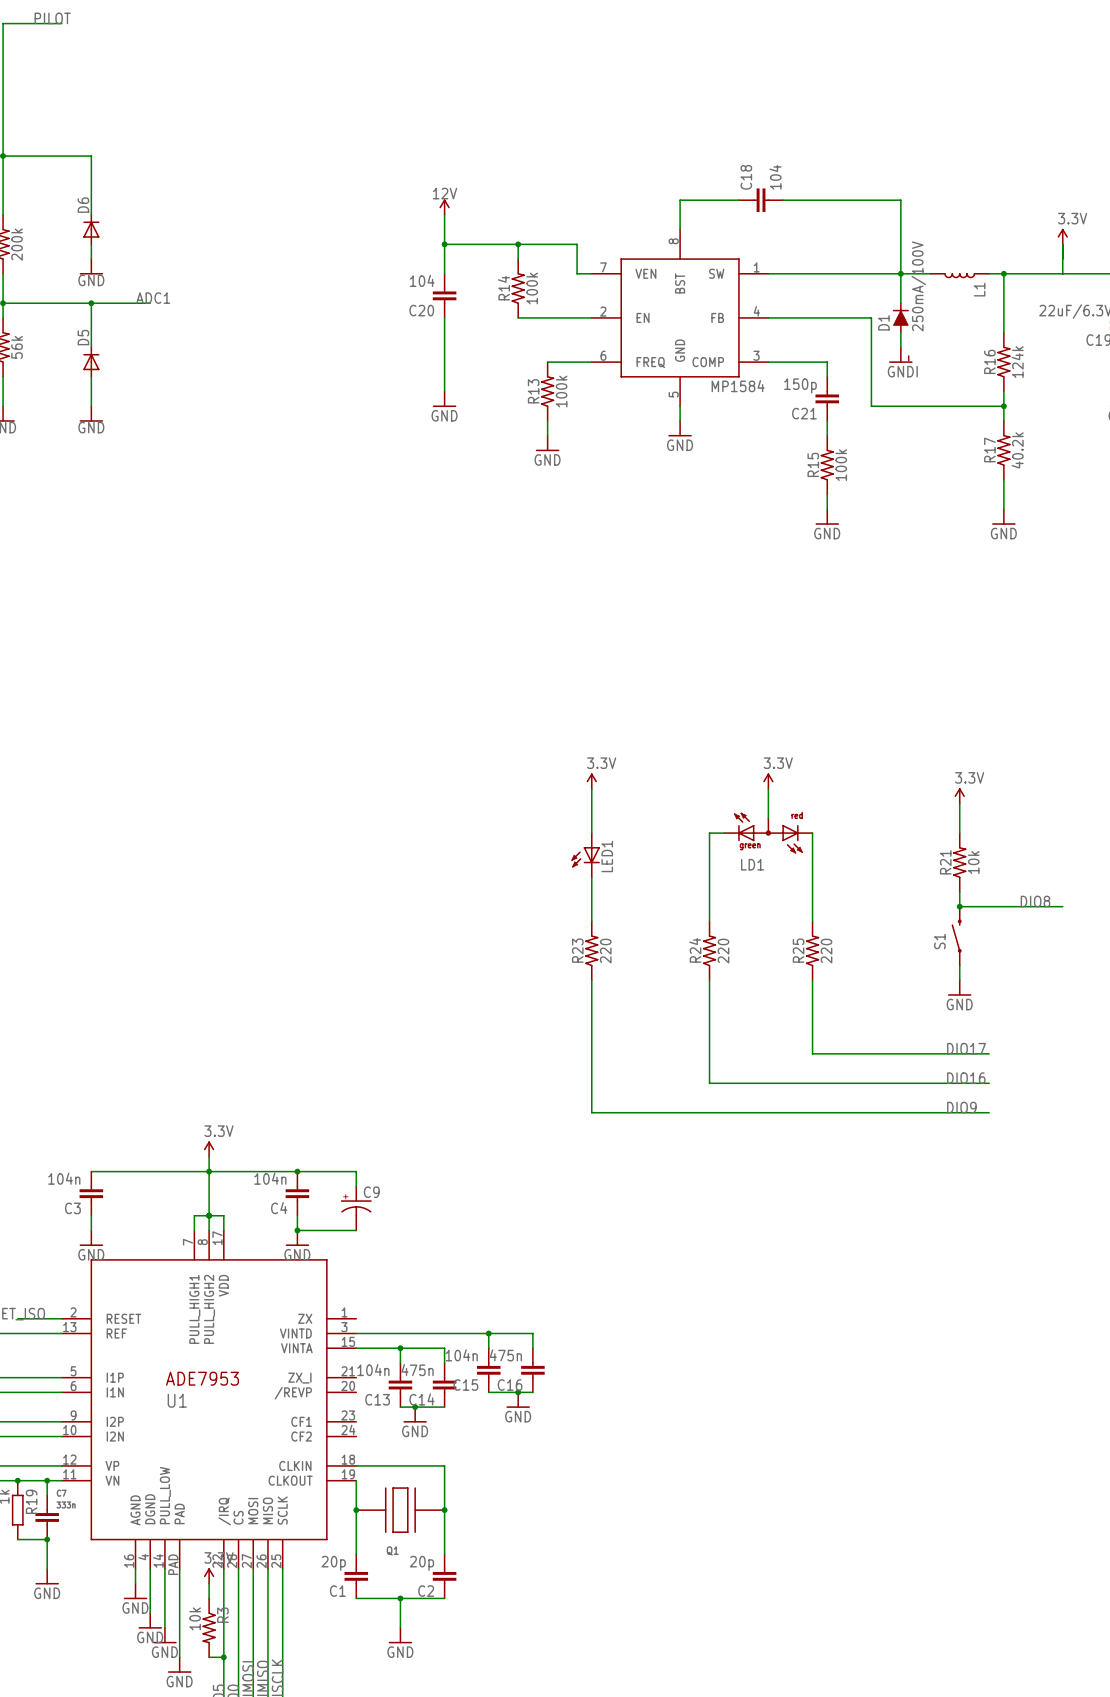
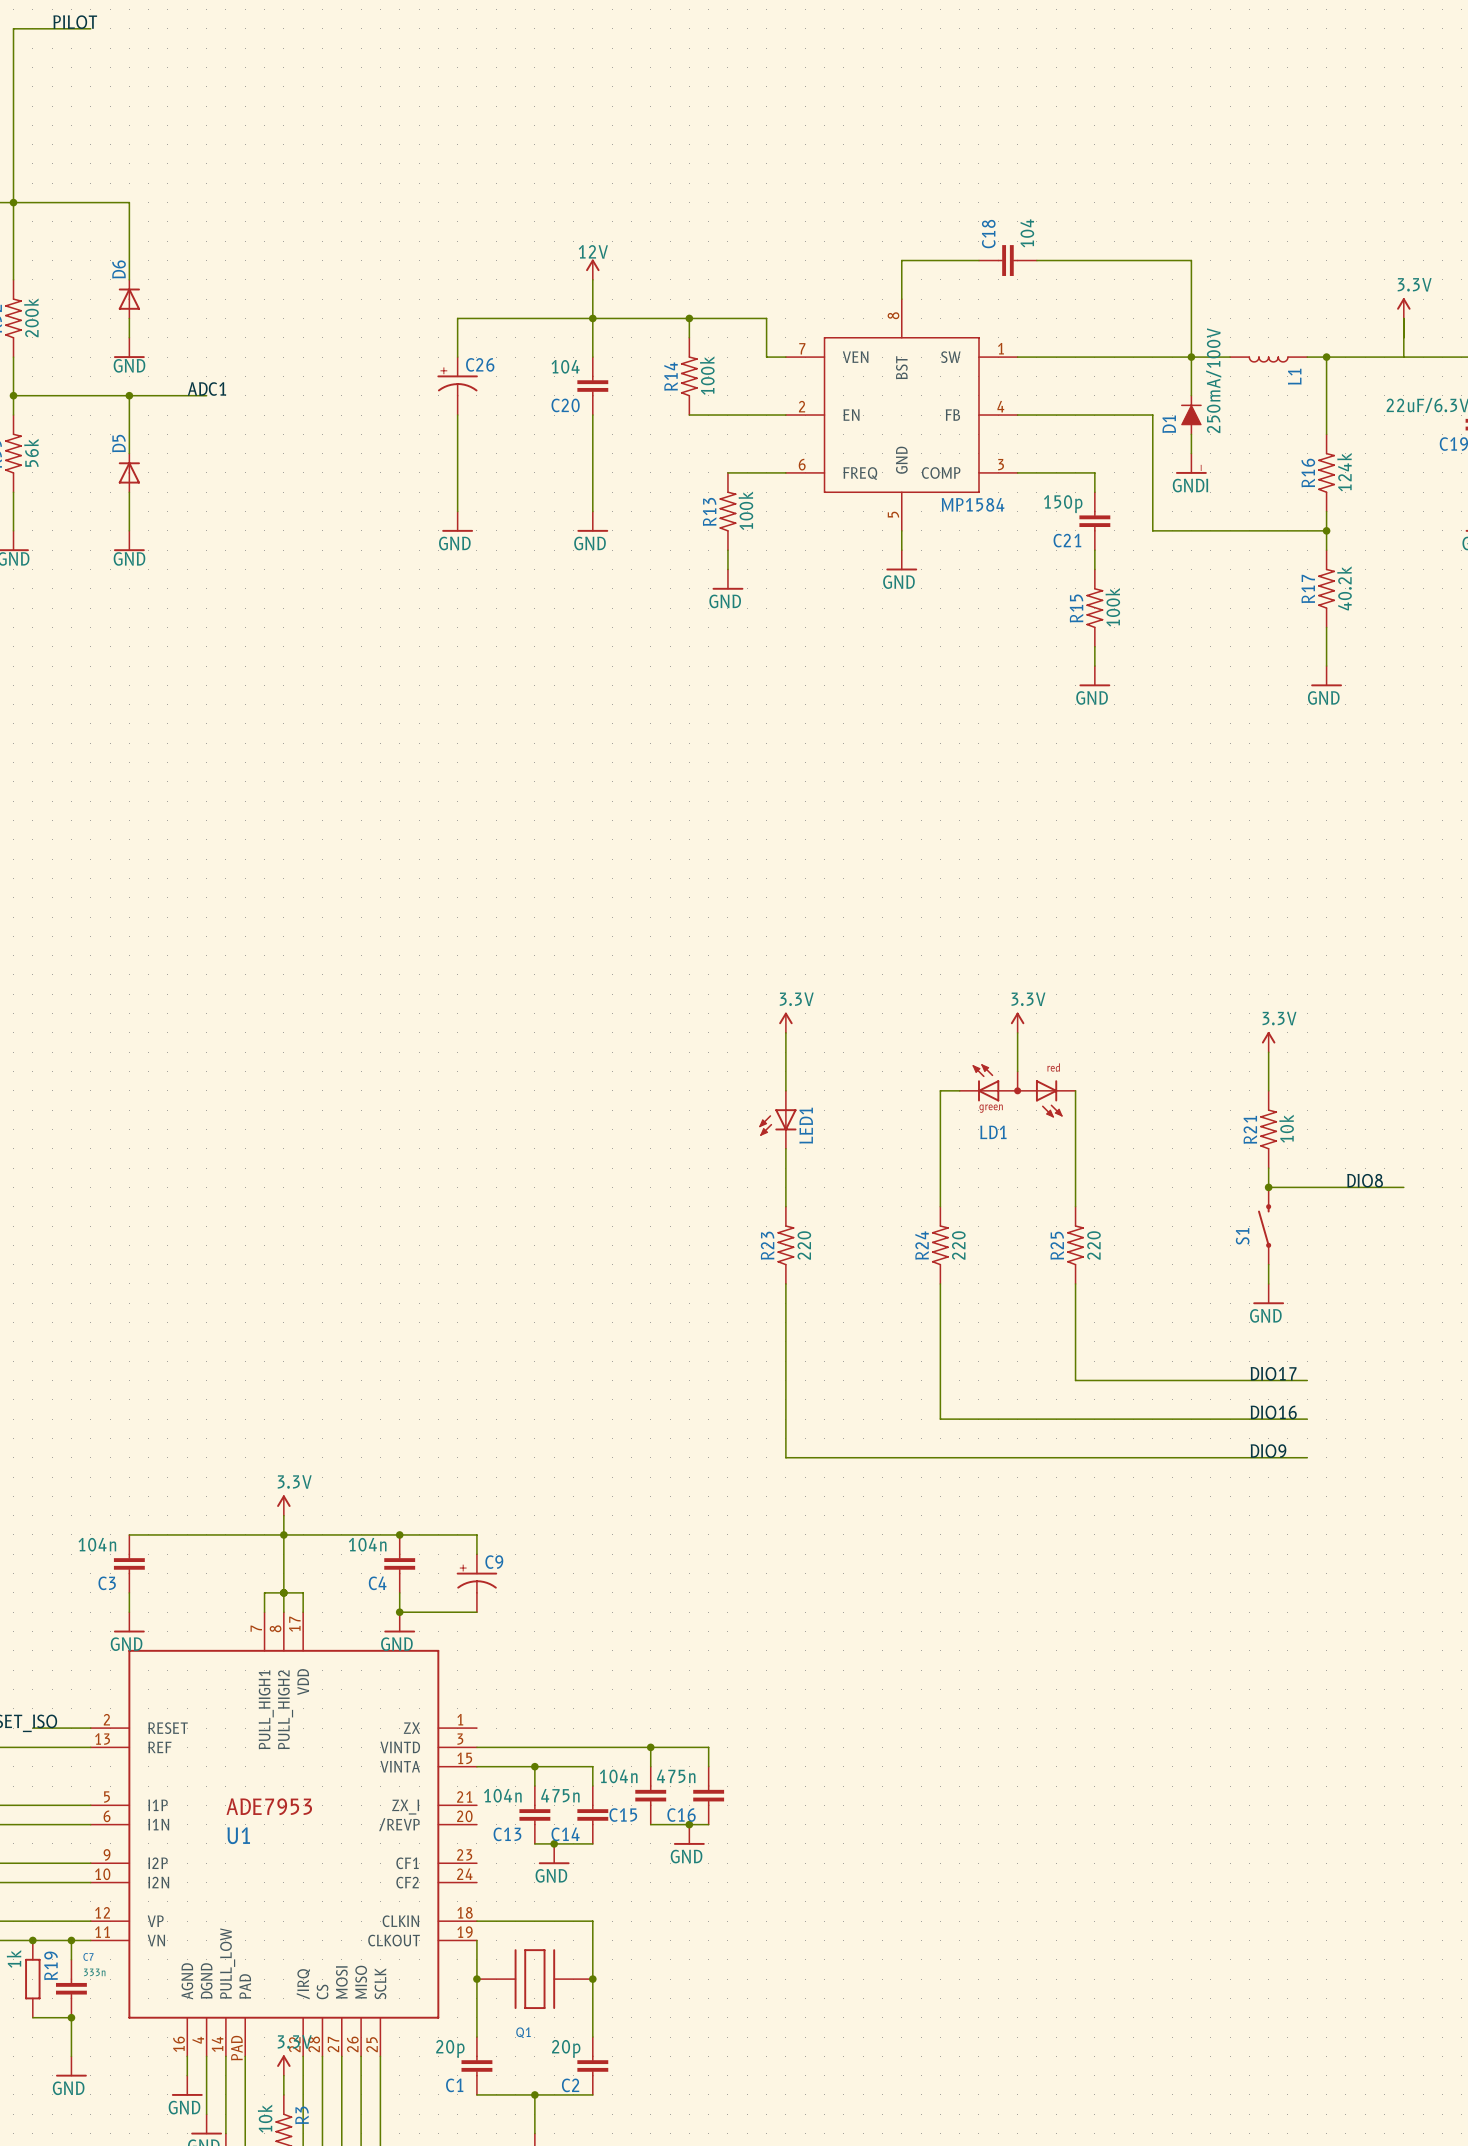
wire: none -> (592, 318) (457, 318) (457, 357)
C26: none -> (457, 386)
wire: none -> (457, 415) (457, 511)
power symbol: none -> GND (457, 521)

